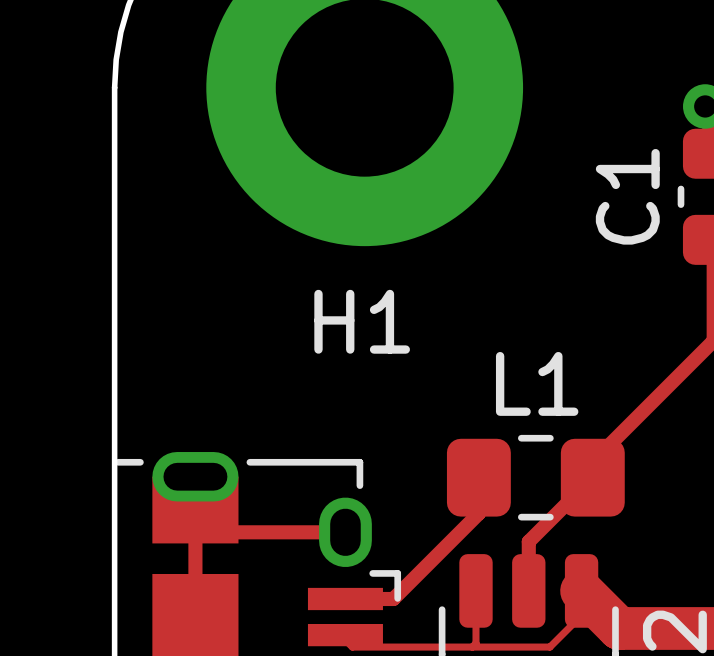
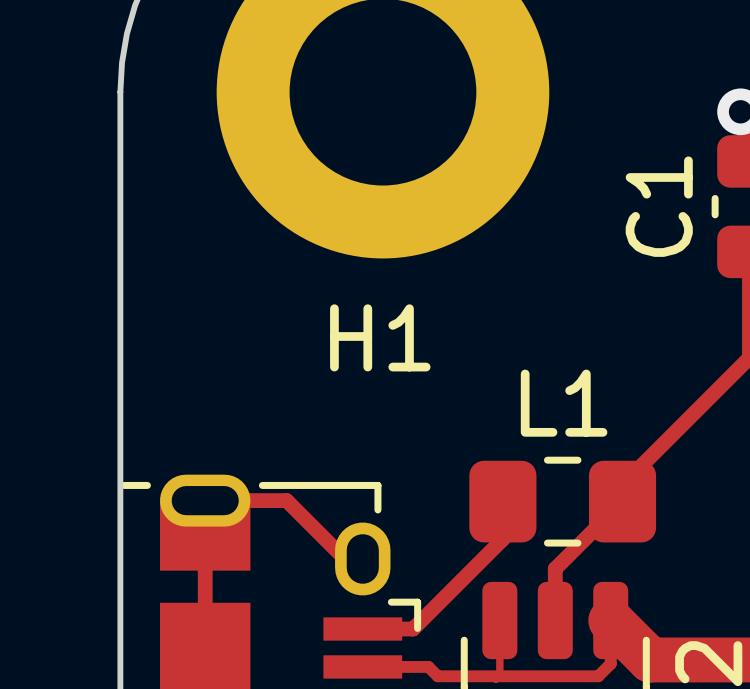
top track: (217, 532) (328, 532) -> (205, 500) (286, 500) (345, 558)
top track: none -> (610, 620) (610, 663) (598, 676) (437, 676) (428, 666) (362, 666)
top track: (581, 615) (549, 647) (352, 647) (345, 640) -> none

